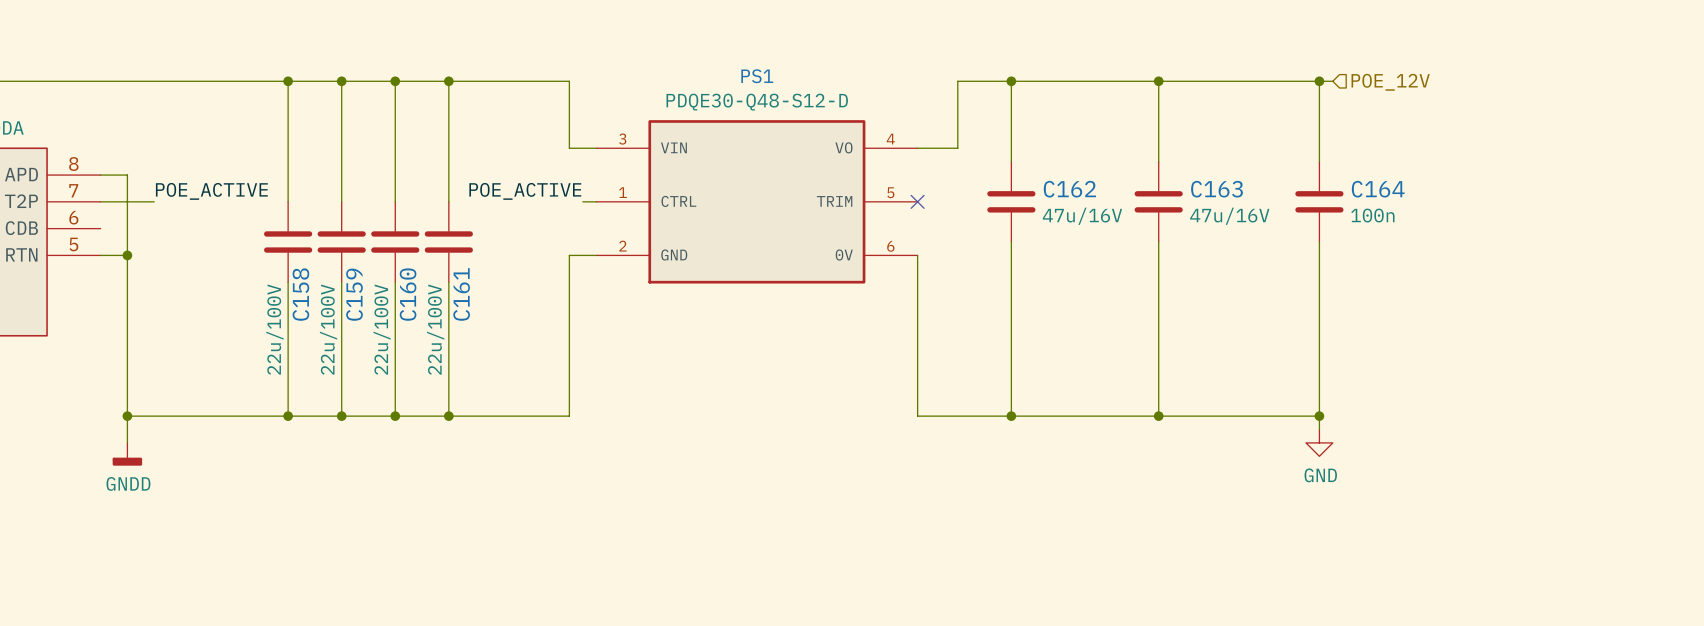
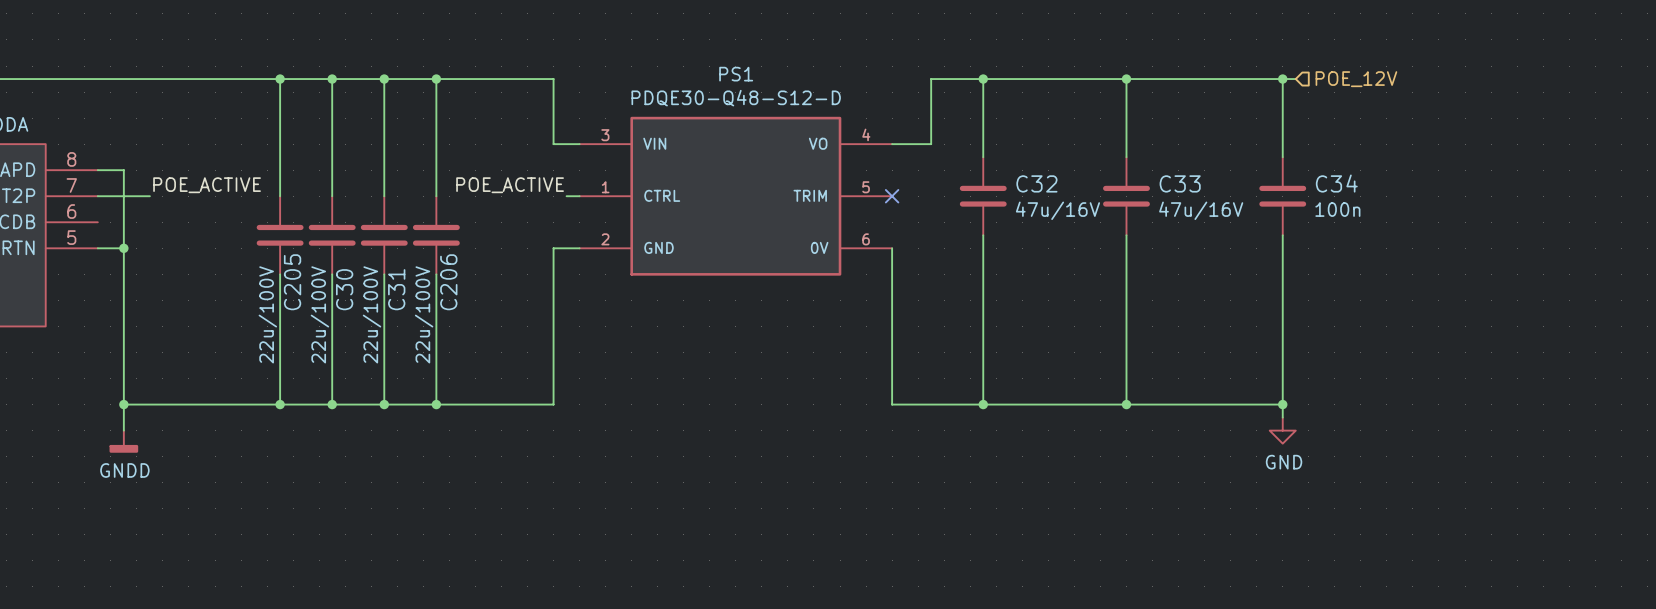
C162 name: C162 (1069, 189) -> C32 (1036, 183)
C163 name: C163 (1216, 189) -> C33 (1180, 183)
C164 name: C164 (1378, 189) -> C34 (1336, 183)
C158 name: C158 (300, 294) -> C205 (292, 282)
C159 name: C159 (354, 294) -> C30 (344, 289)
C160 name: C160 (408, 294) -> C31 (396, 289)
C161 name: C161 (461, 294) -> C206 (448, 282)

